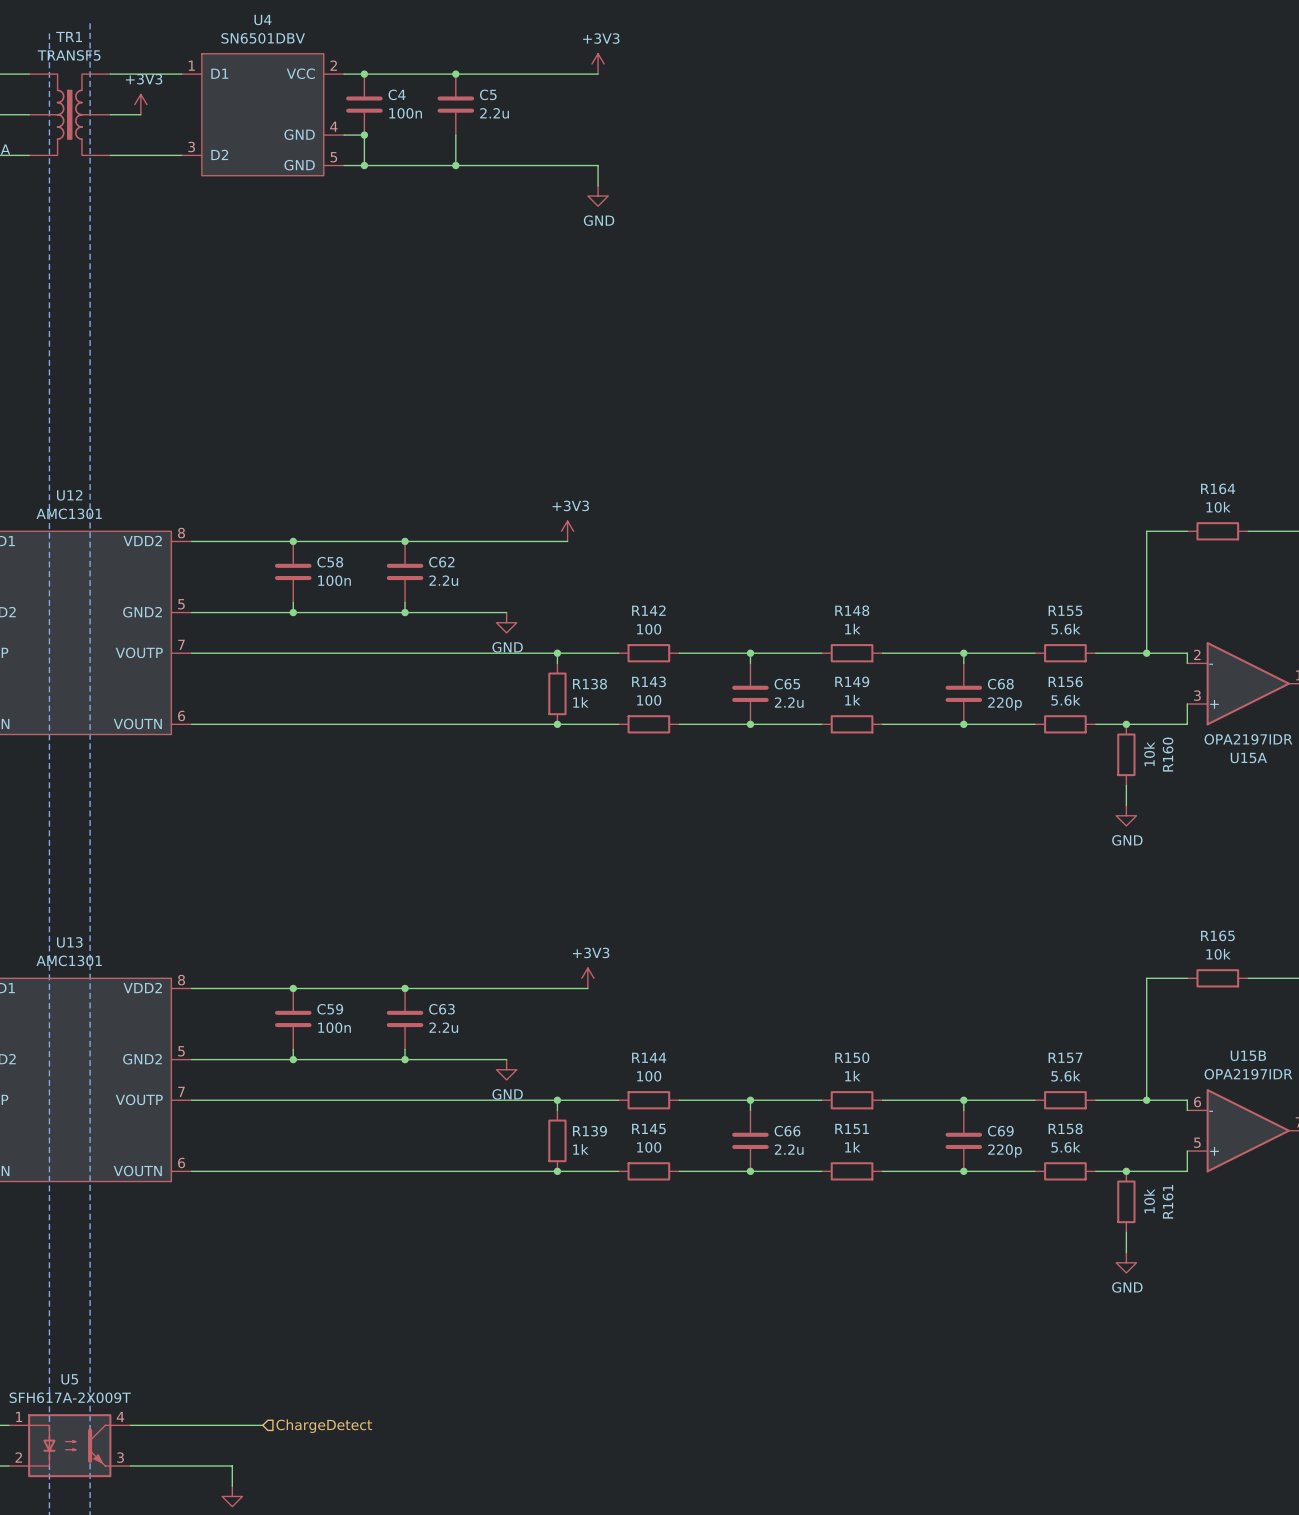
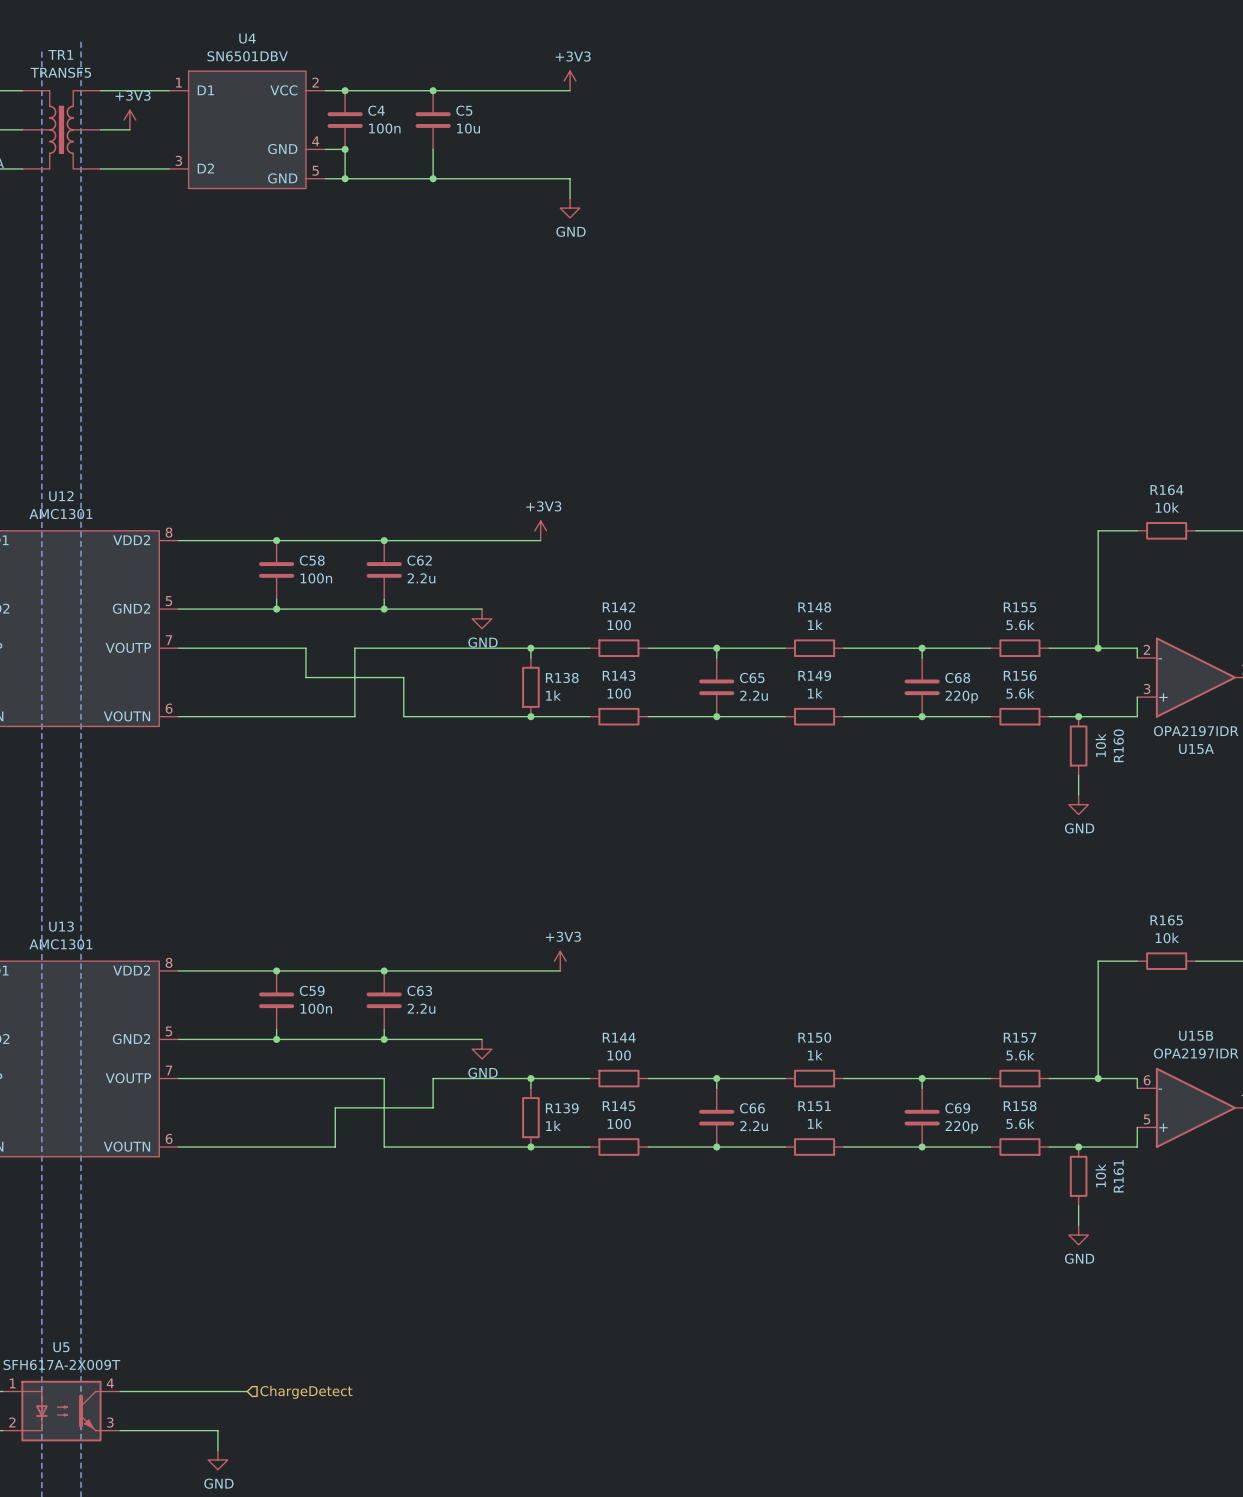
C5 value: 2.2u (494, 113) -> 10u (468, 128)
wire: (323, 653) (374, 653) -> (354, 716) (354, 648)
wire: (374, 724) (425, 724) -> (305, 648) (305, 677) (403, 677) (403, 716)
wire: (405, 1100) (455, 1100) -> (335, 1147) (335, 1107) (433, 1107) (433, 1078)
wire: (354, 1171) (405, 1171) -> (384, 1078) (384, 1147)

